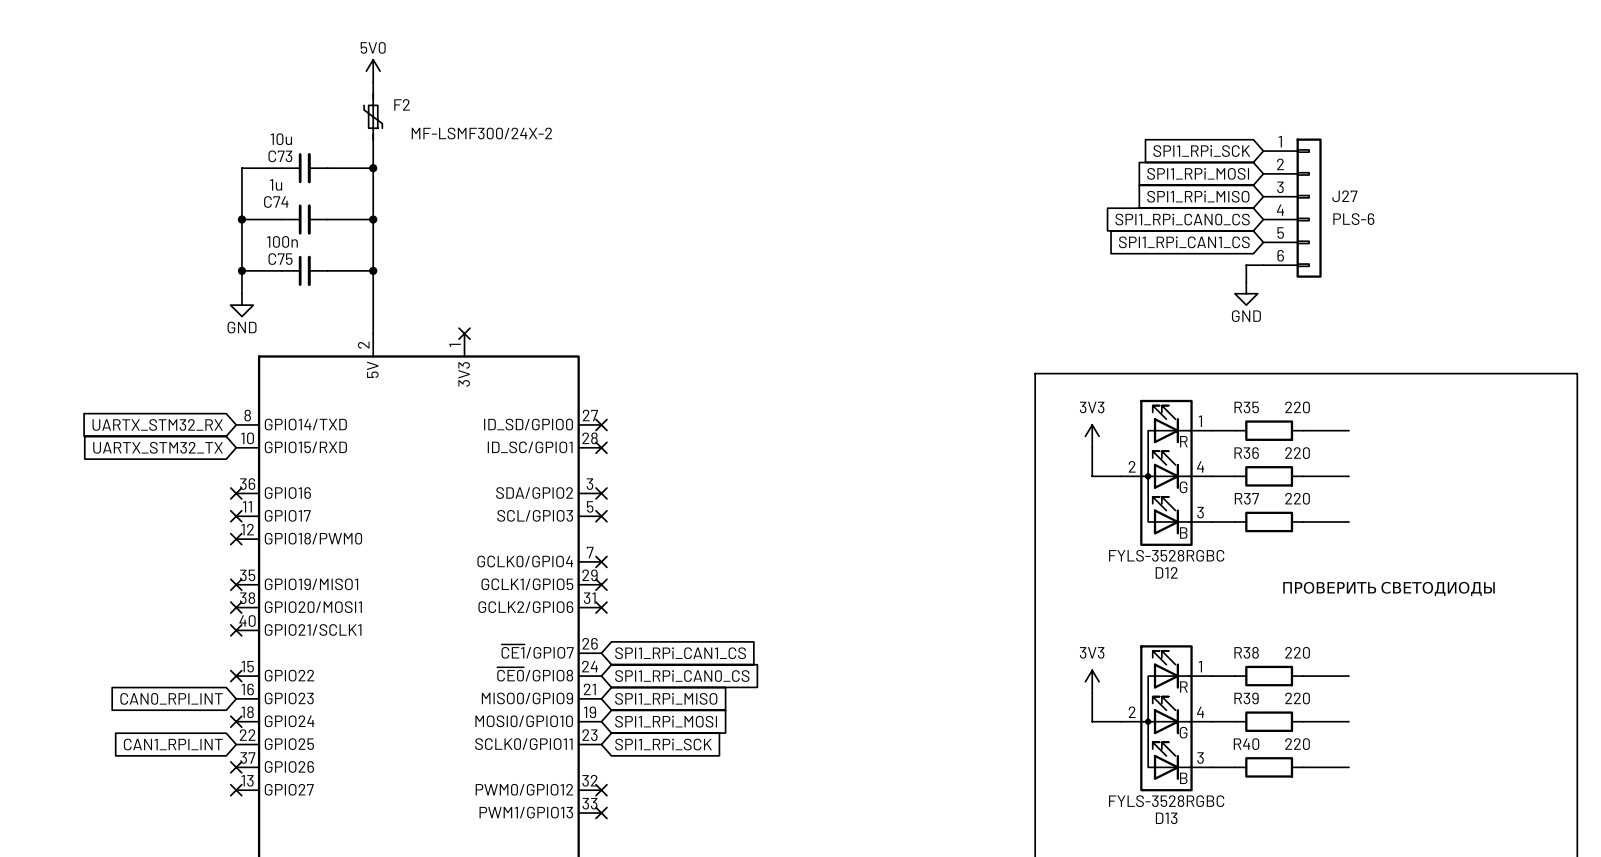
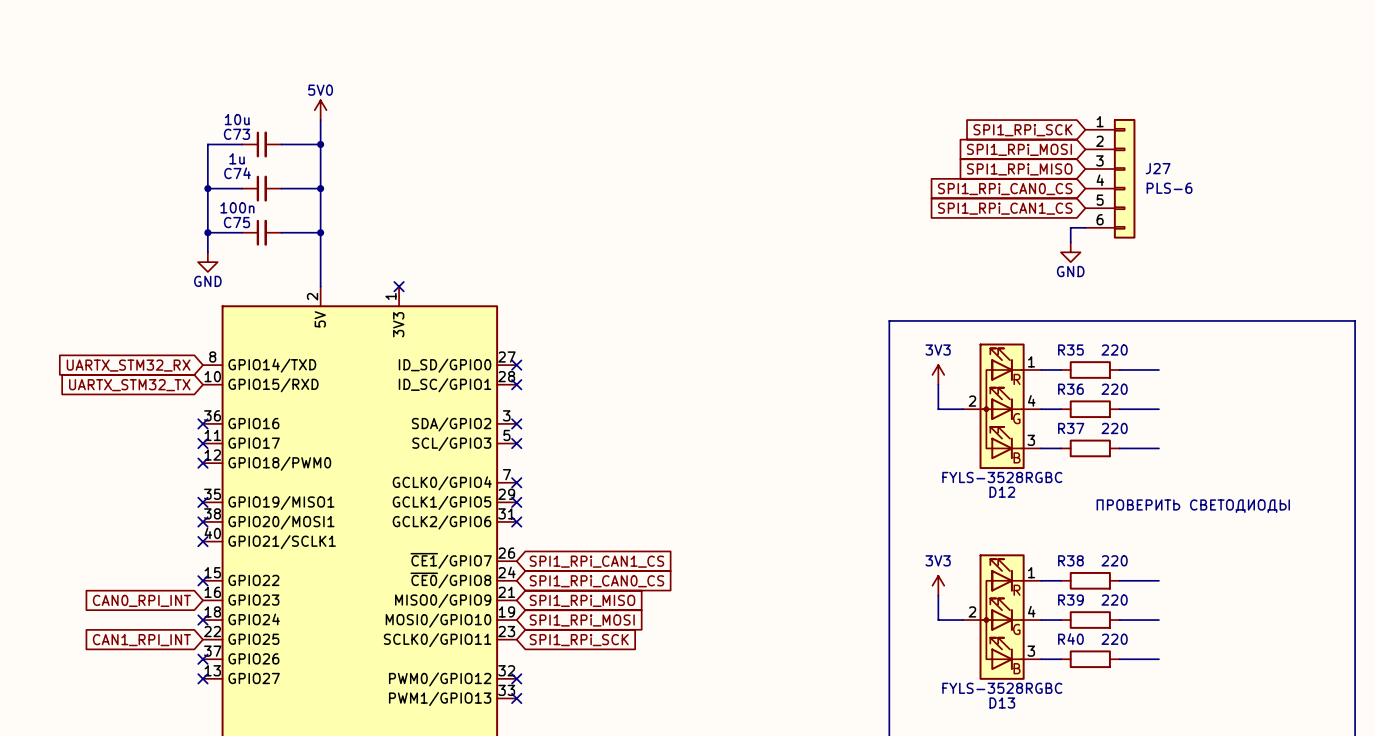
power symbol position: 5V0 (373, 71) -> 5V0 (320, 110)
wire: (373, 82) (373, 93) -> none
F2: MF-LSMF300/24X-2 (373, 116) -> none

